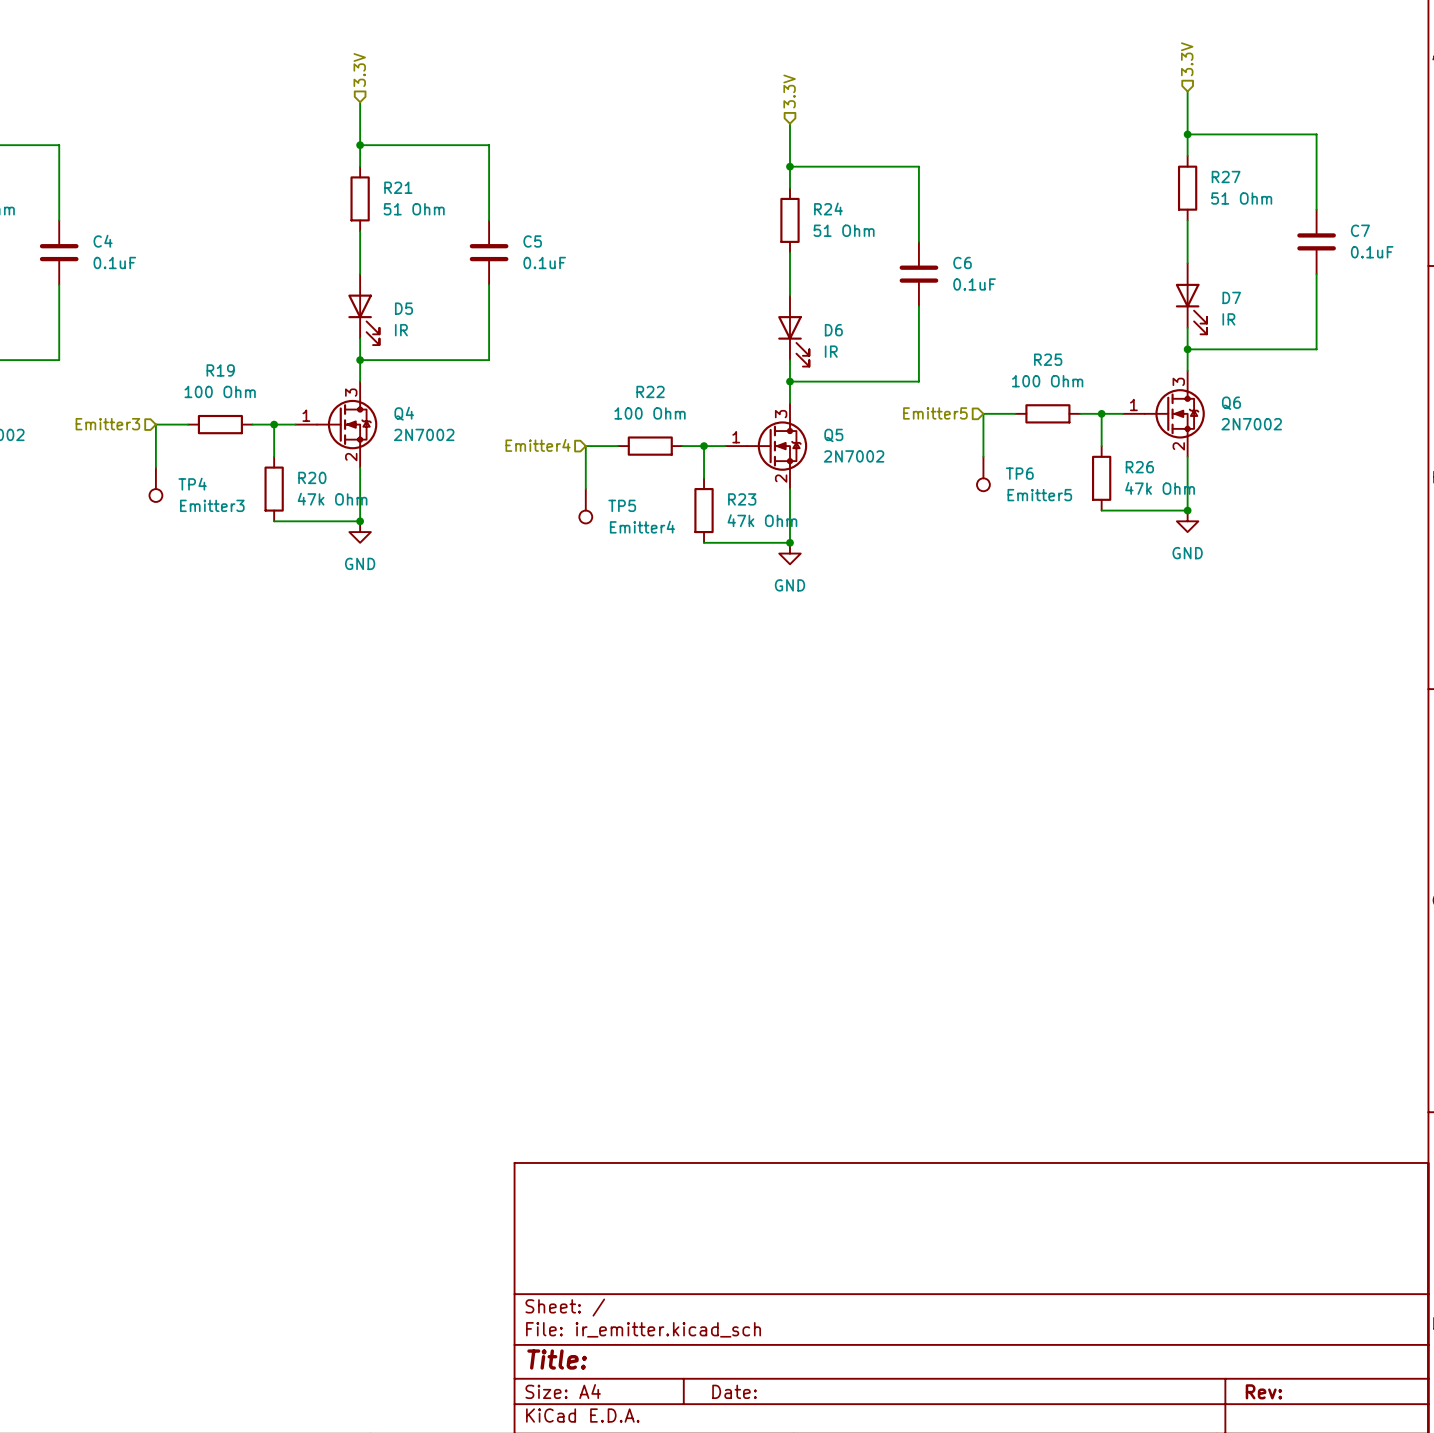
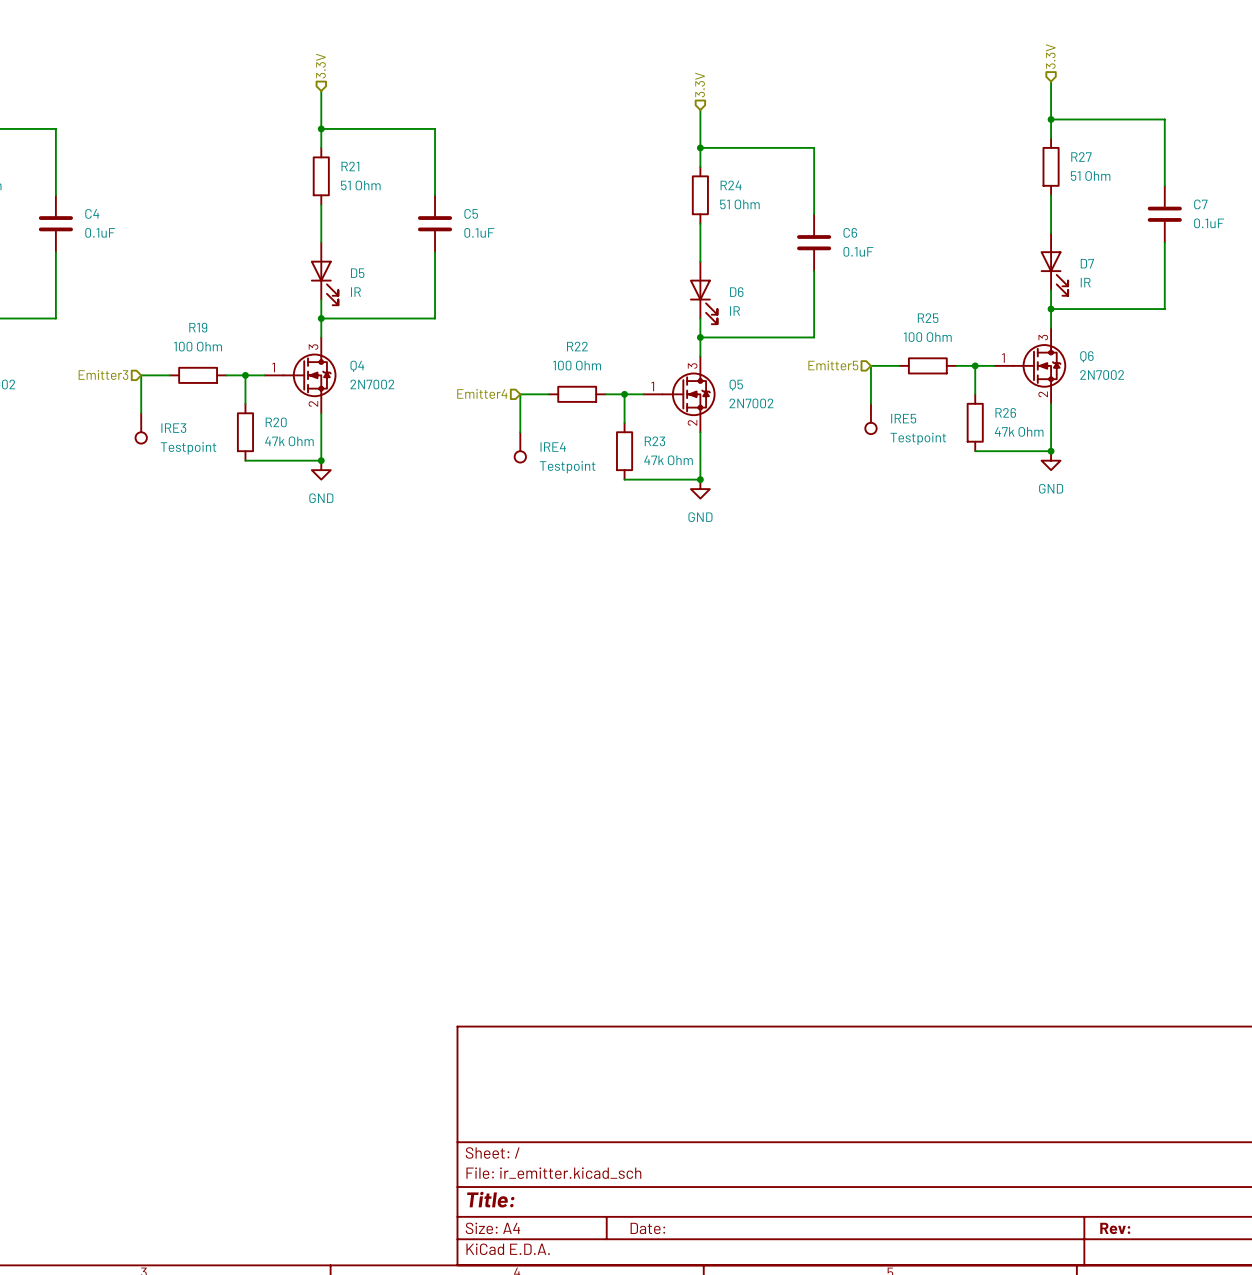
TP6 name: TP6 (1019, 473) -> IRE5 (903, 418)
TP4 name: TP4 (192, 484) -> IRE3 (173, 428)
TP6 value: Emitter5 (1039, 495) -> Testpoint (918, 438)
TP4 value: Emitter3 (212, 505) -> Testpoint (188, 448)
TP5 name: TP5 (622, 505) -> IRE4 (553, 447)
TP5 value: Emitter4 (642, 527) -> Testpoint (567, 467)

